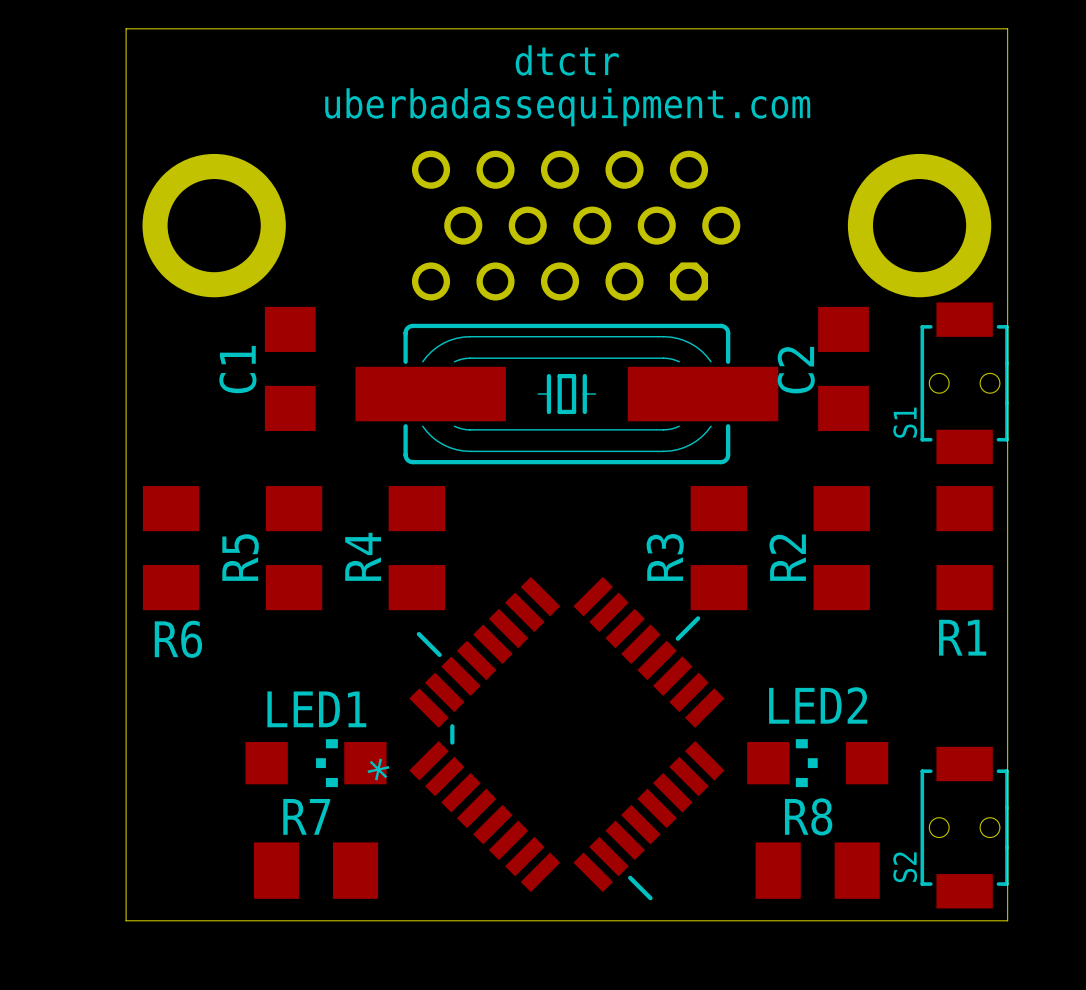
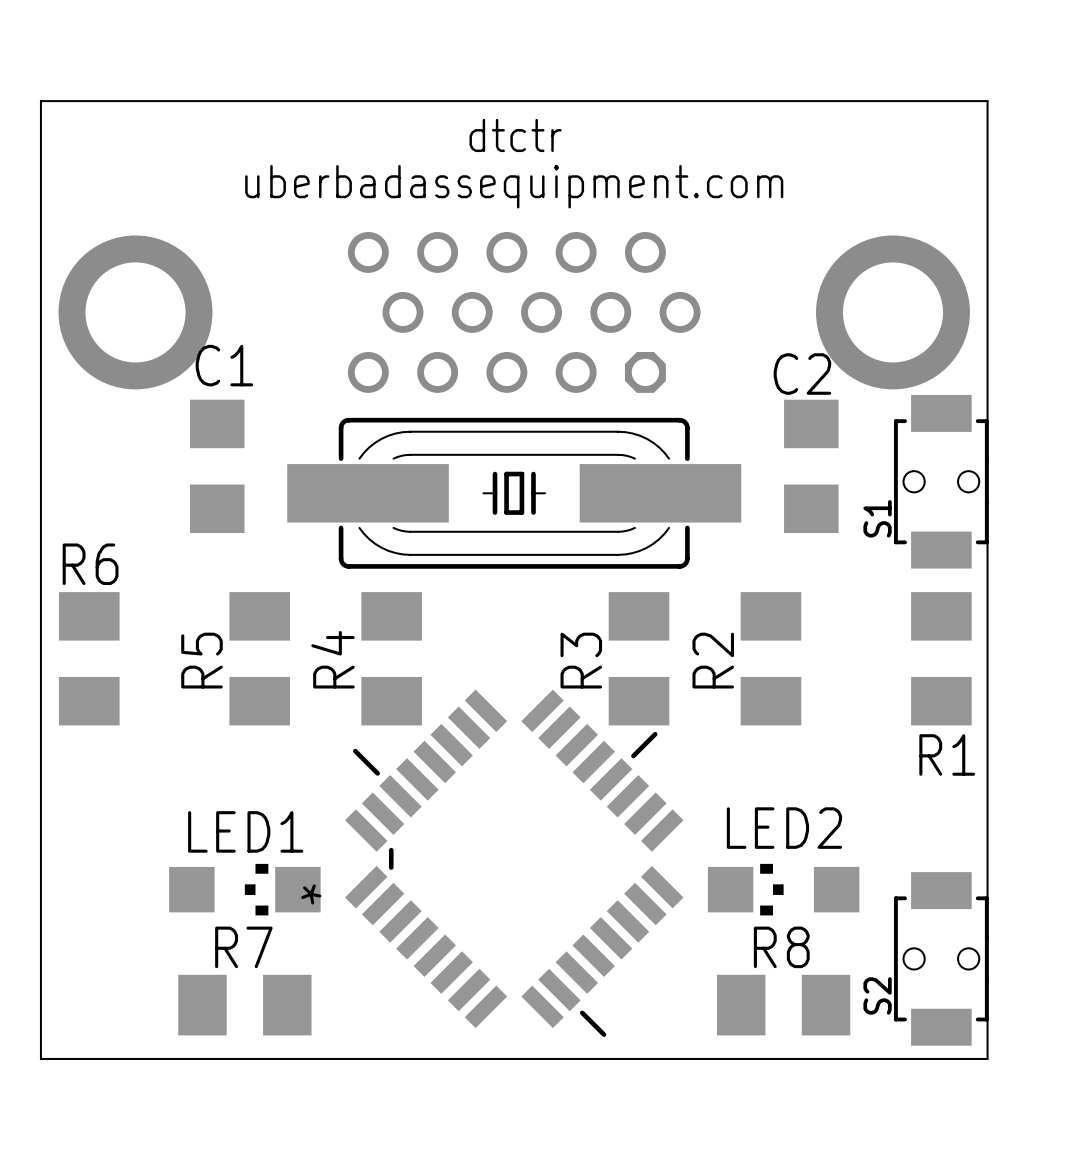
C1 name rotation: 0° (237, 369) -> 90° clockwise (224, 365)
C1 name position: C1 (237, 369) -> C1 (224, 365)
C2 name rotation: 0° (796, 370) -> 90° clockwise (802, 374)
C2 name position: C2 (796, 370) -> C2 (802, 374)
R5 position: (293, 548) -> (259, 658)
R4 position: (416, 548) -> (391, 658)
R3 position: (718, 548) -> (639, 658)
R2 position: (841, 548) -> (770, 658)
R6 name position: R6 (178, 639) -> R6 (90, 564)

